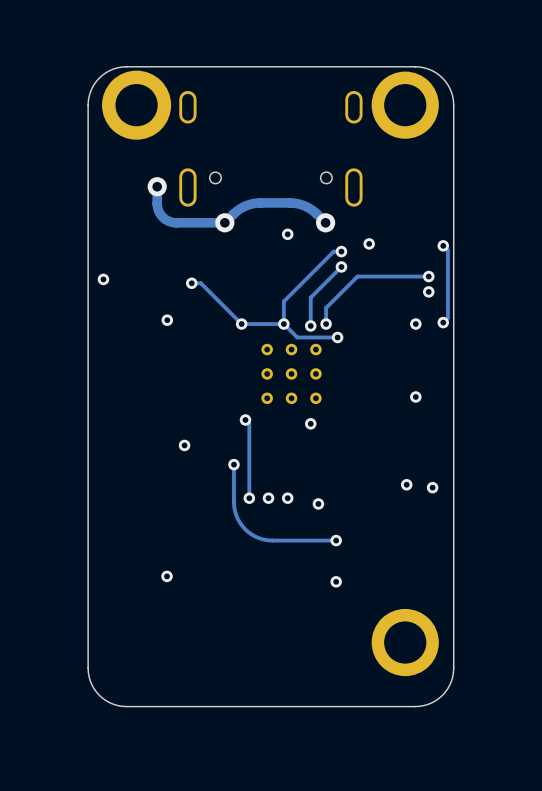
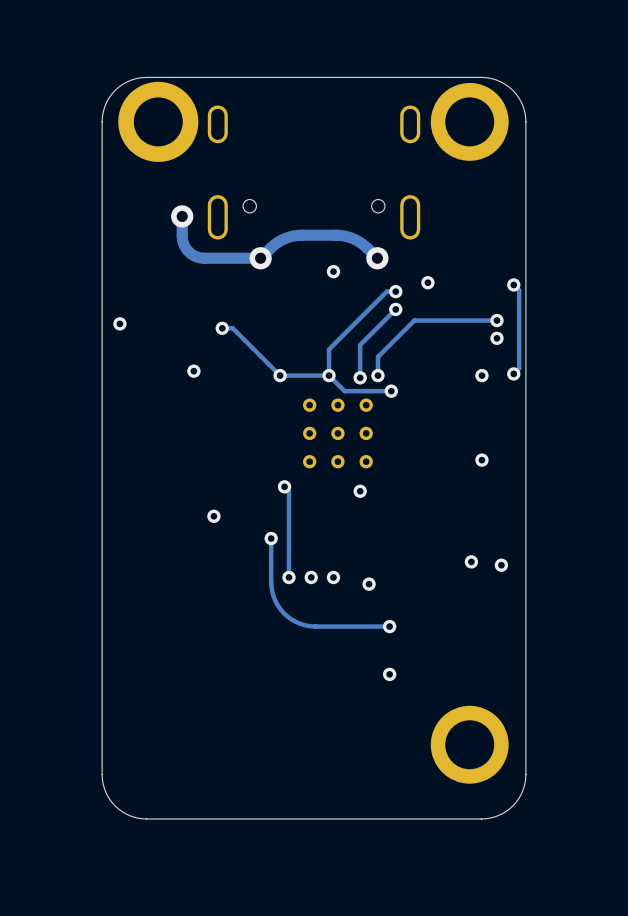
via: (167, 576) -> none

